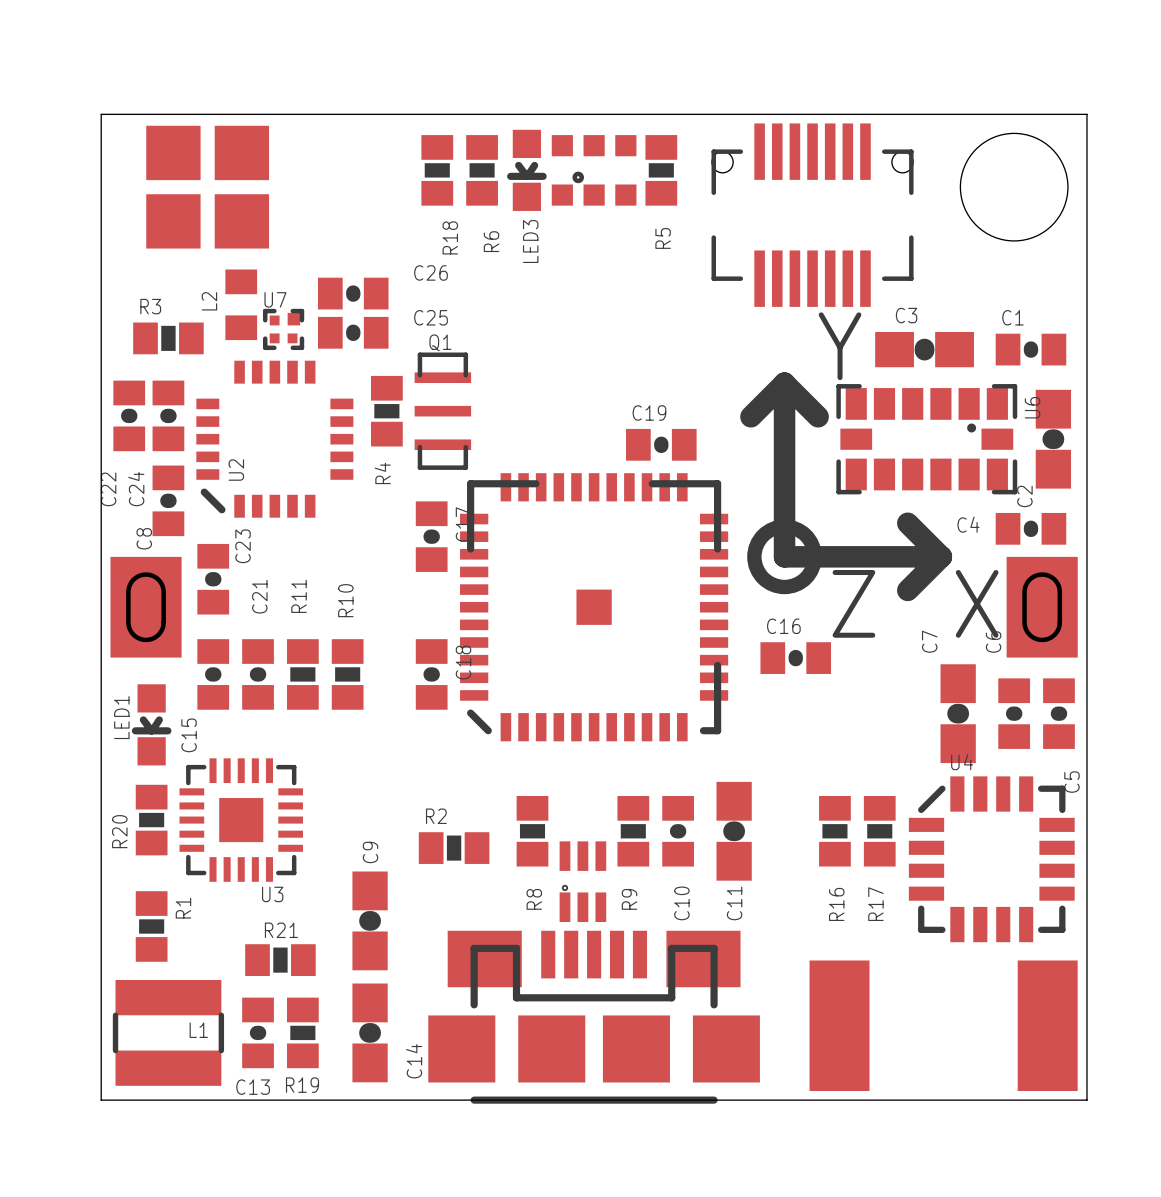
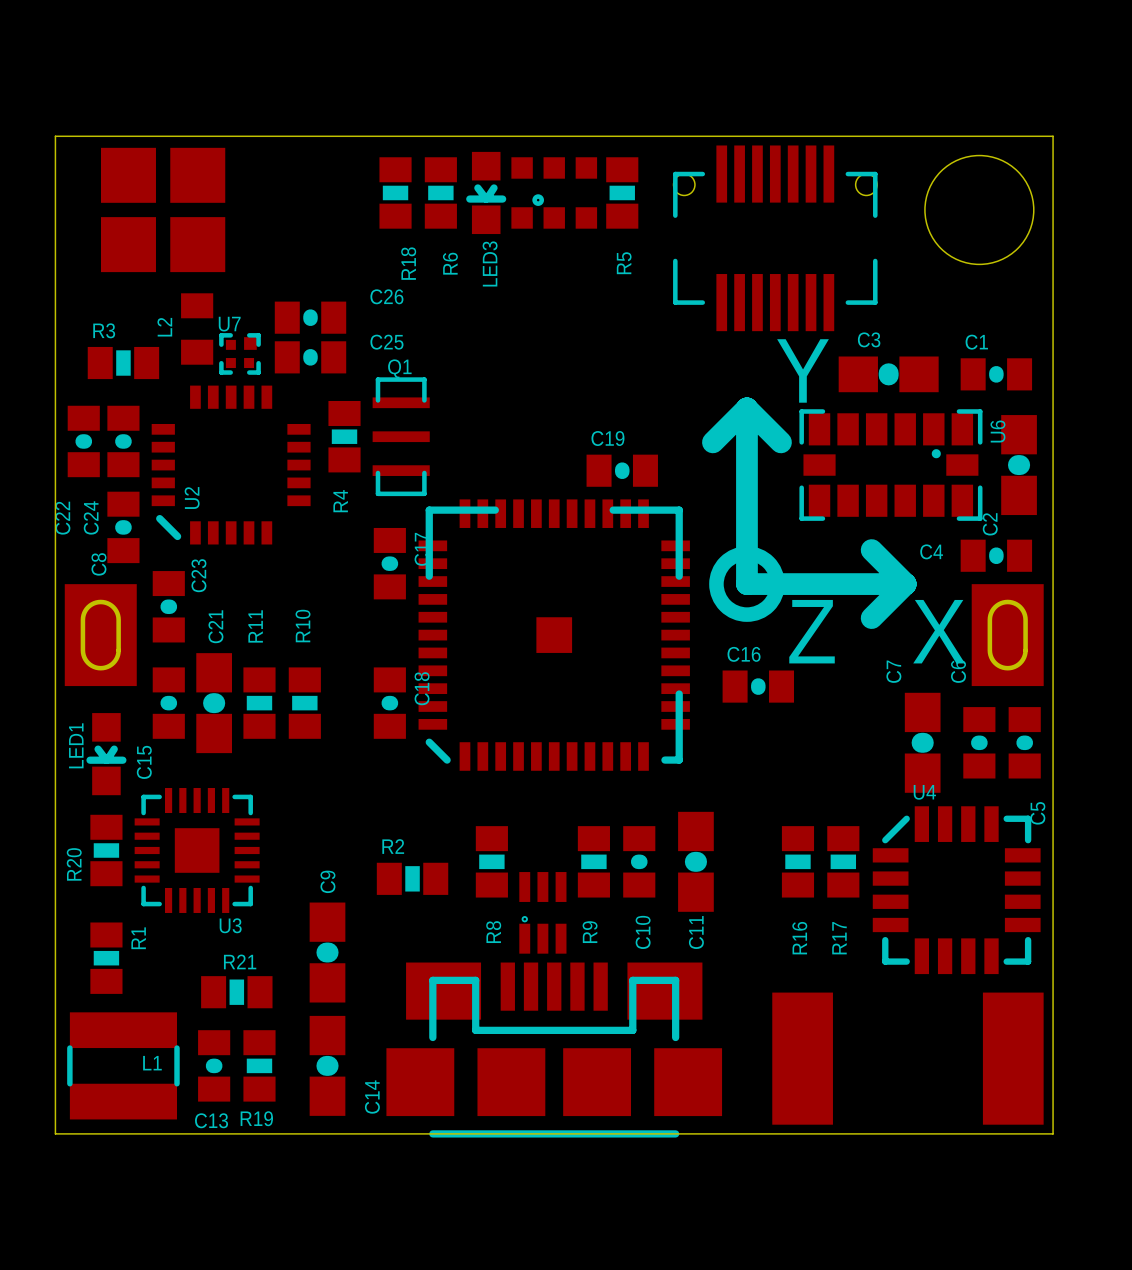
C21 footprint: [242, 639, 274, 710] -> [196, 653, 232, 754]

